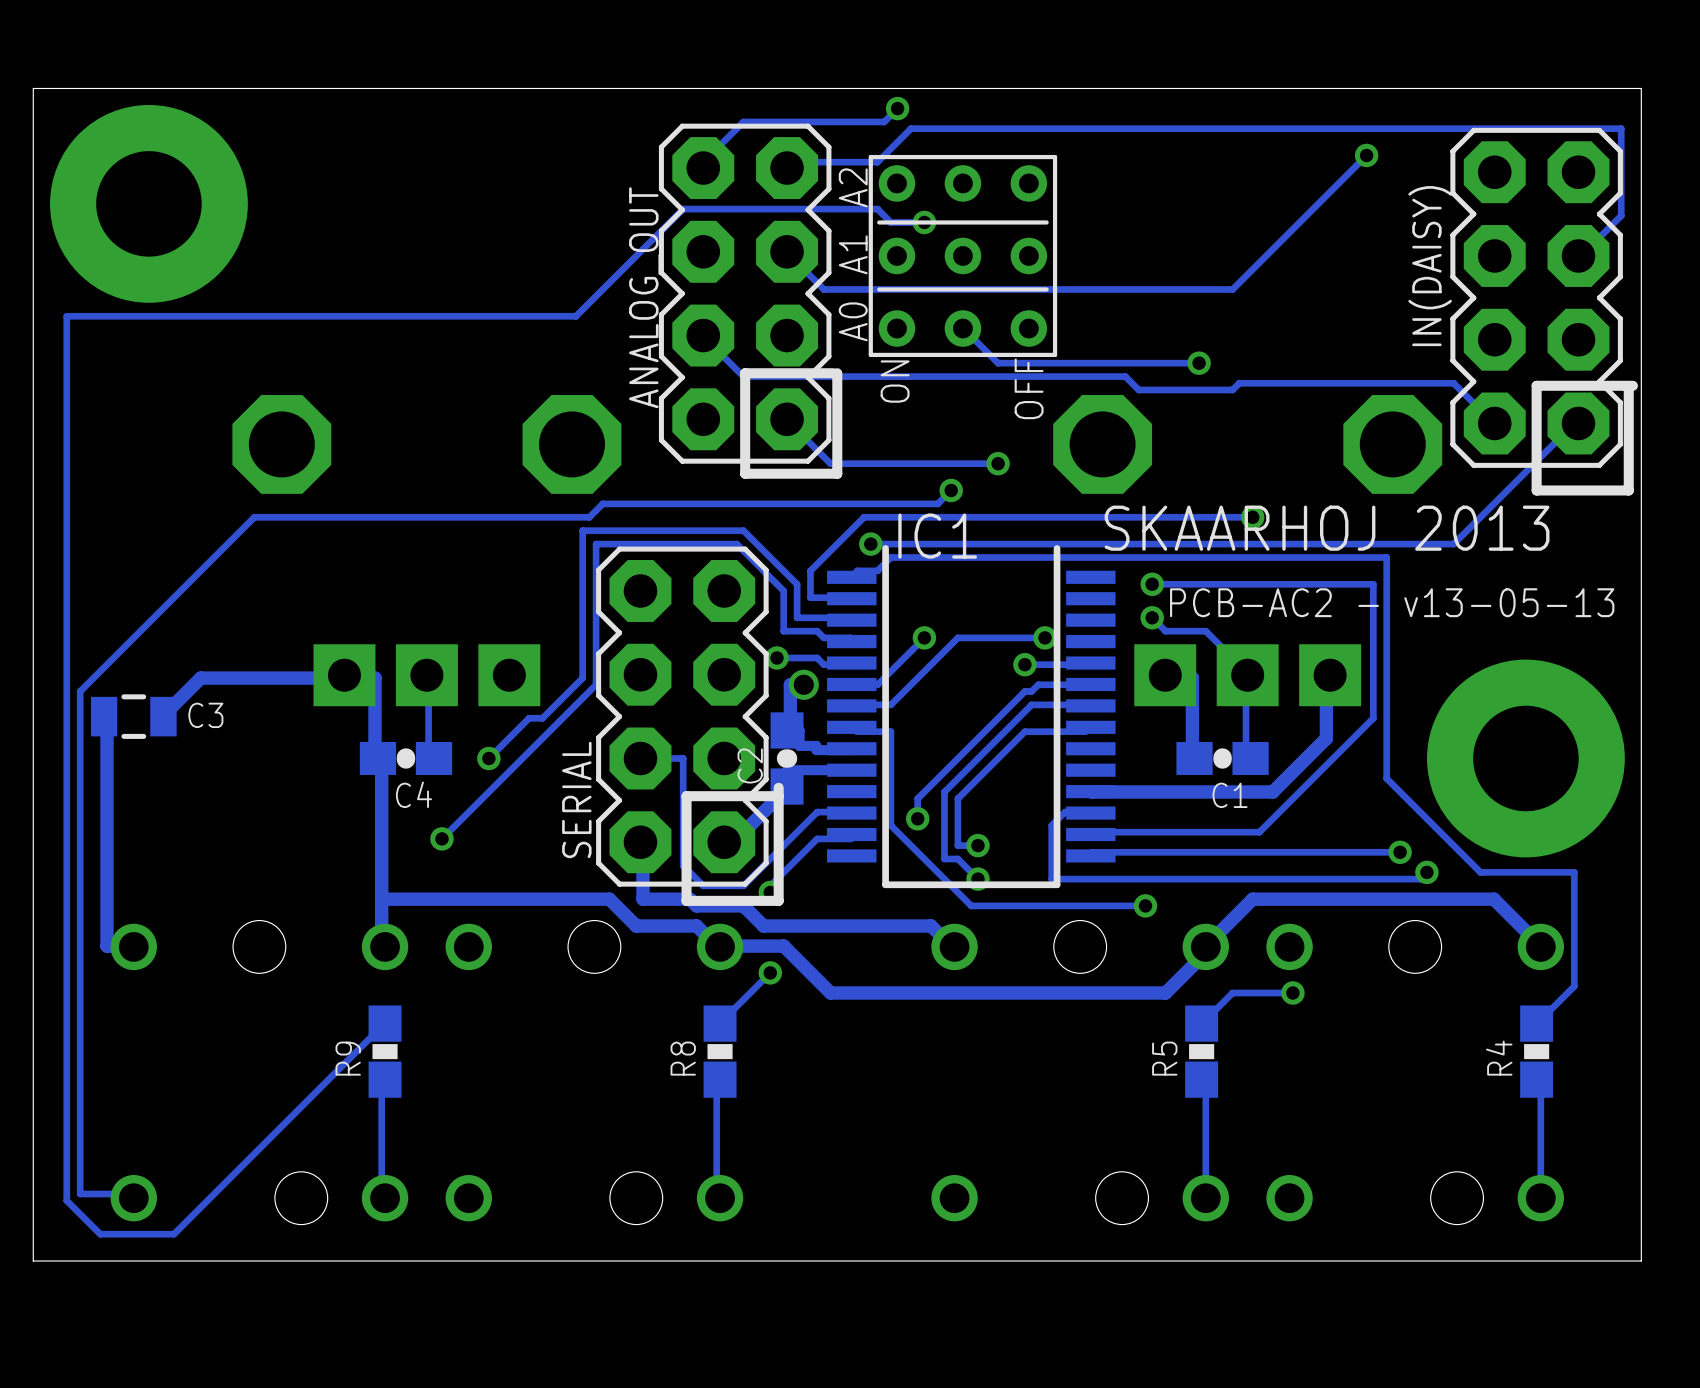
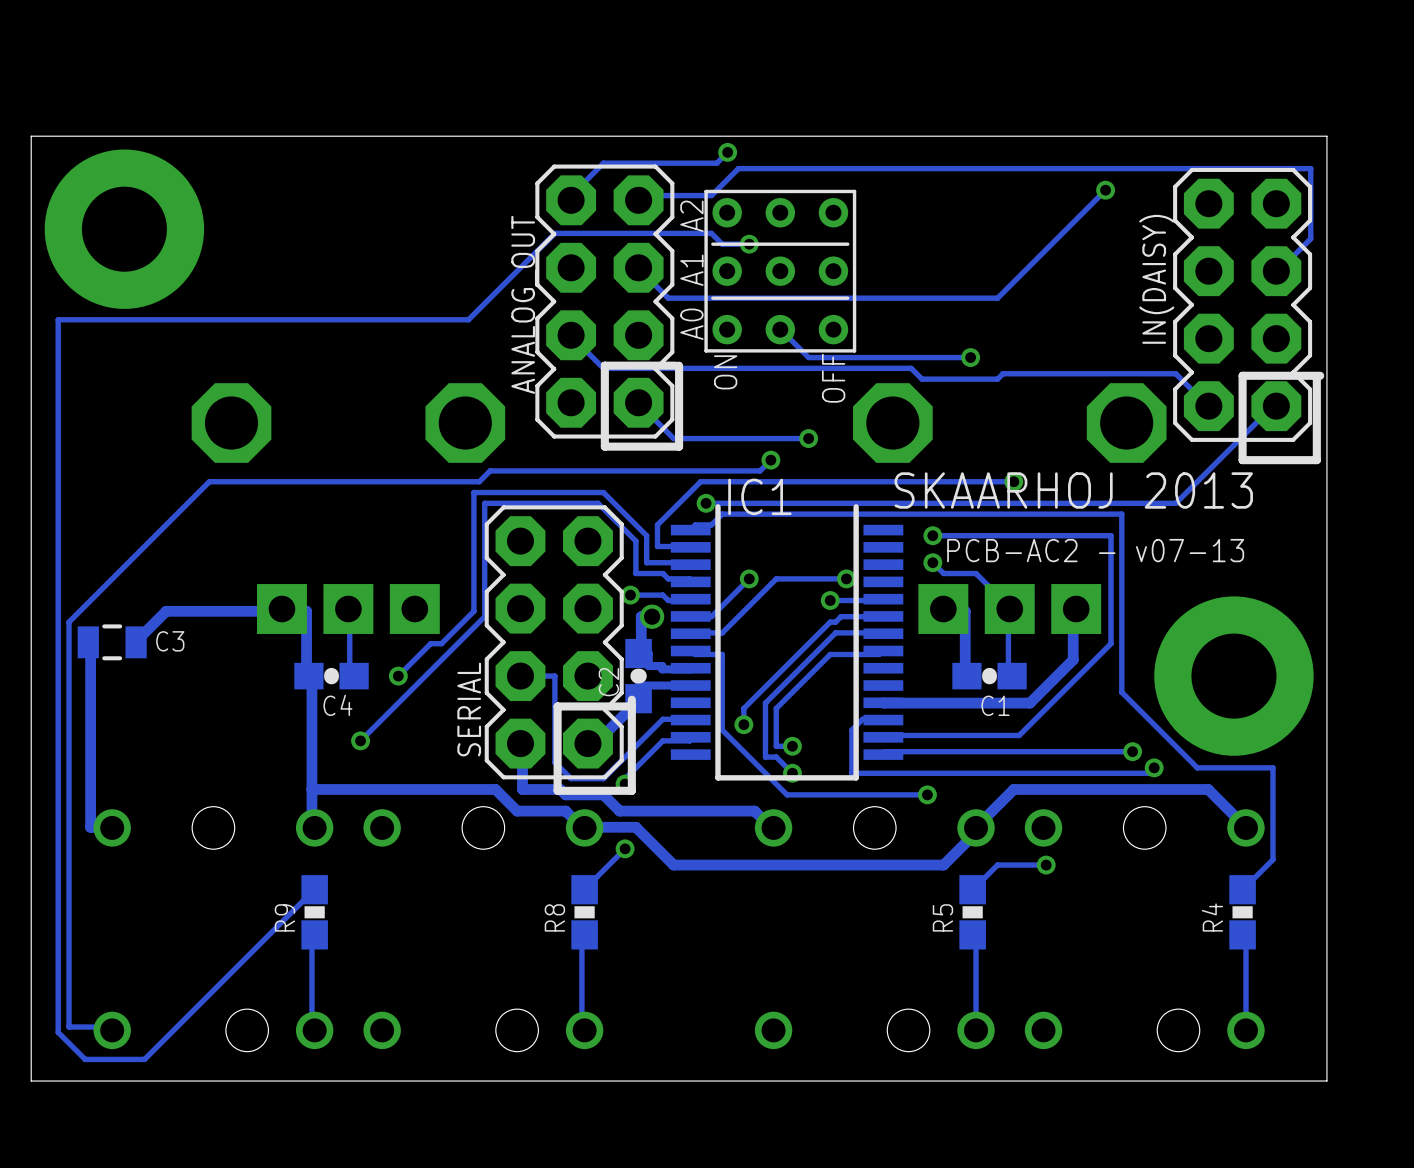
text: PCB-AC2 - v13-05-13 (1392, 602) -> PCB-AC2 - v07-13 (1095, 550)

